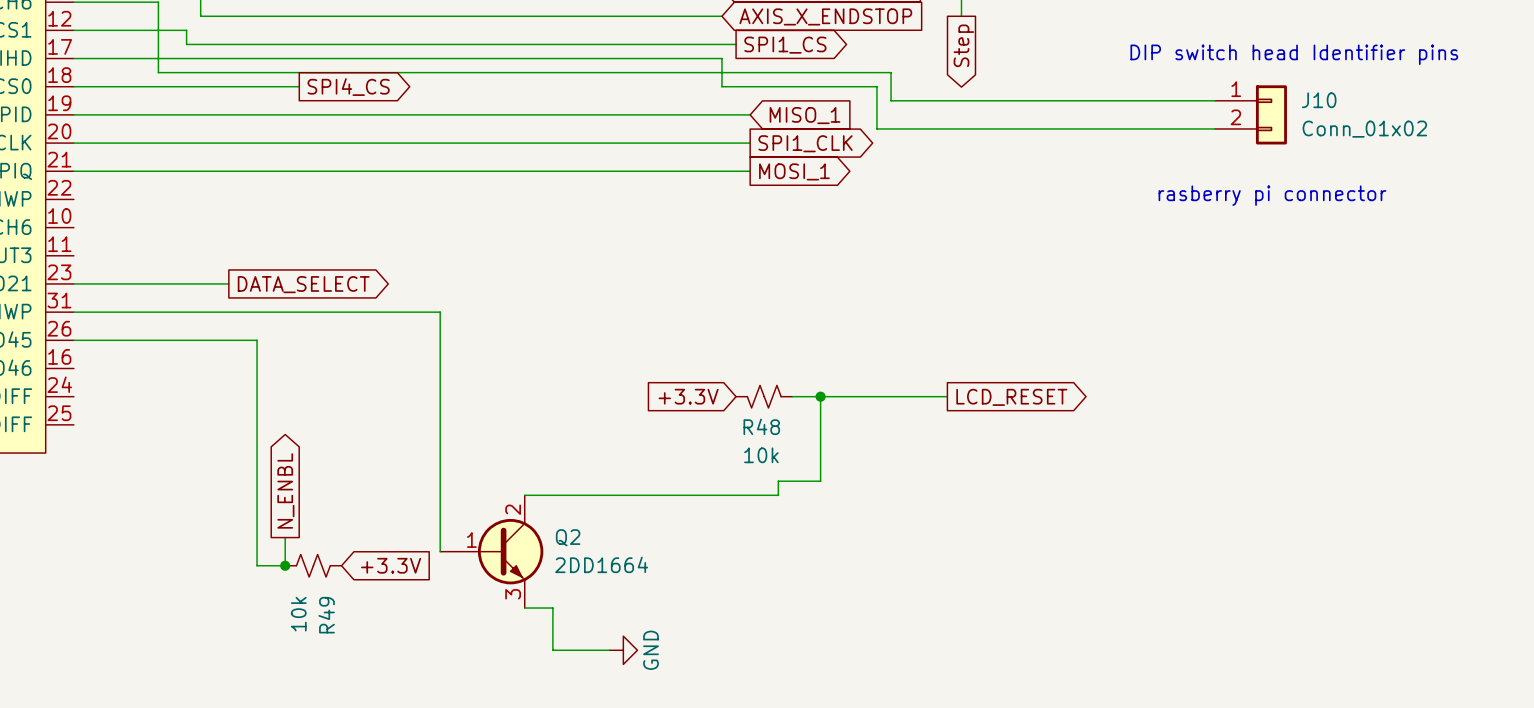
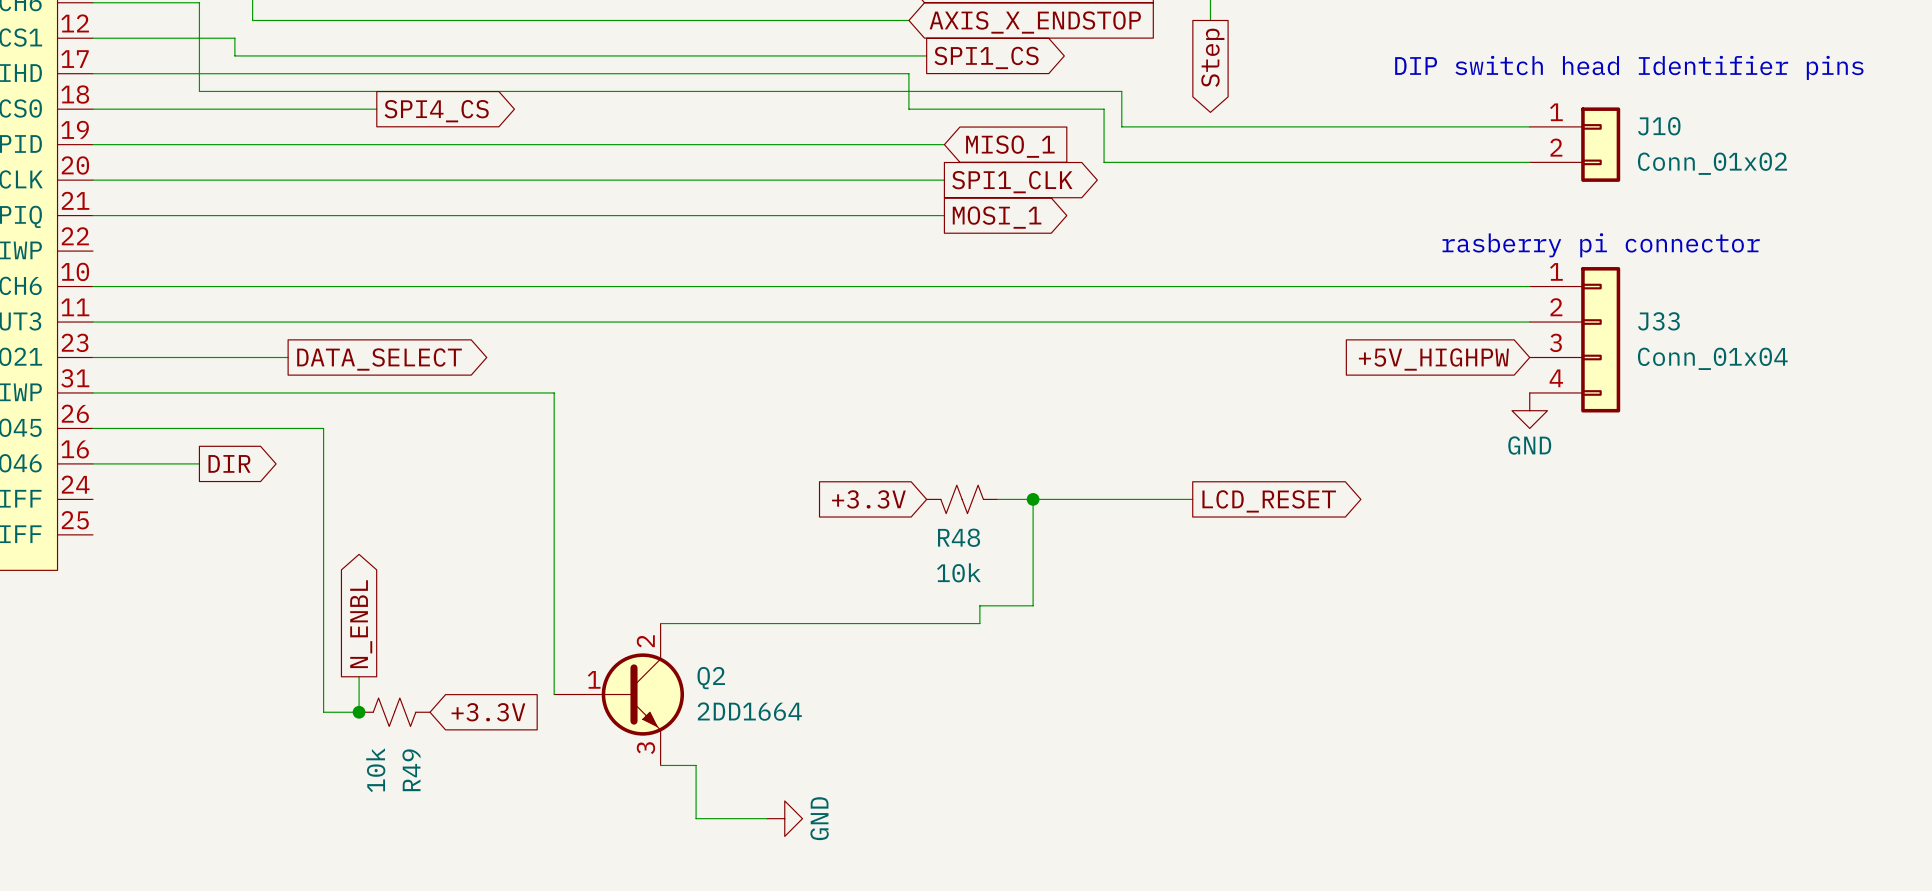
wire: none -> (93, 286) (1529, 286)
wire: none -> (93, 322) (1529, 322)
J33: none -> Conn_01x04 (1574, 339)
global label: none -> +5V_HIGHPW (1433, 359)
power symbol: none -> GND (1529, 410)
wire: none -> (93, 463) (199, 463)
global label: none -> DIR (229, 463)

